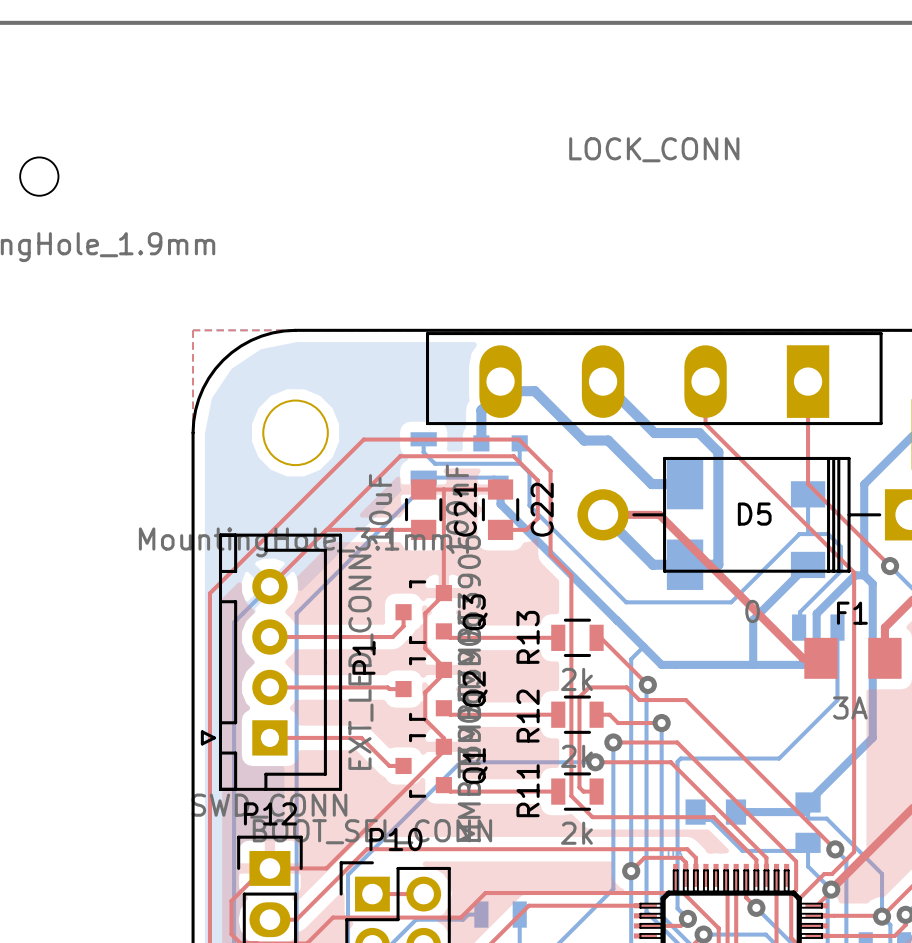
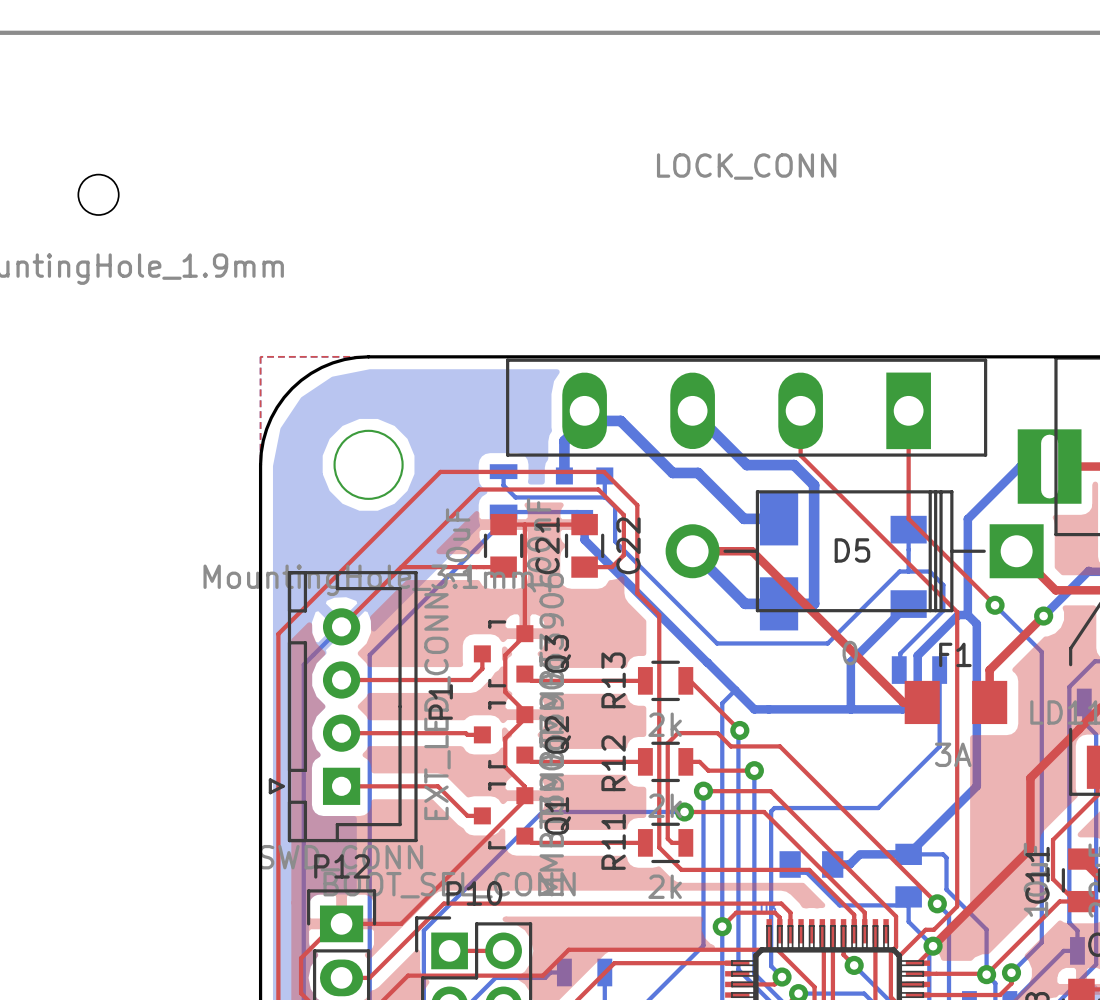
bottom track: (808, 802) (808, 818) (826, 818) (843, 835) -> none
bottom track: (808, 810) (752, 812) -> (946, 889) (946, 857) (943, 854) (859, 854) (849, 864)

